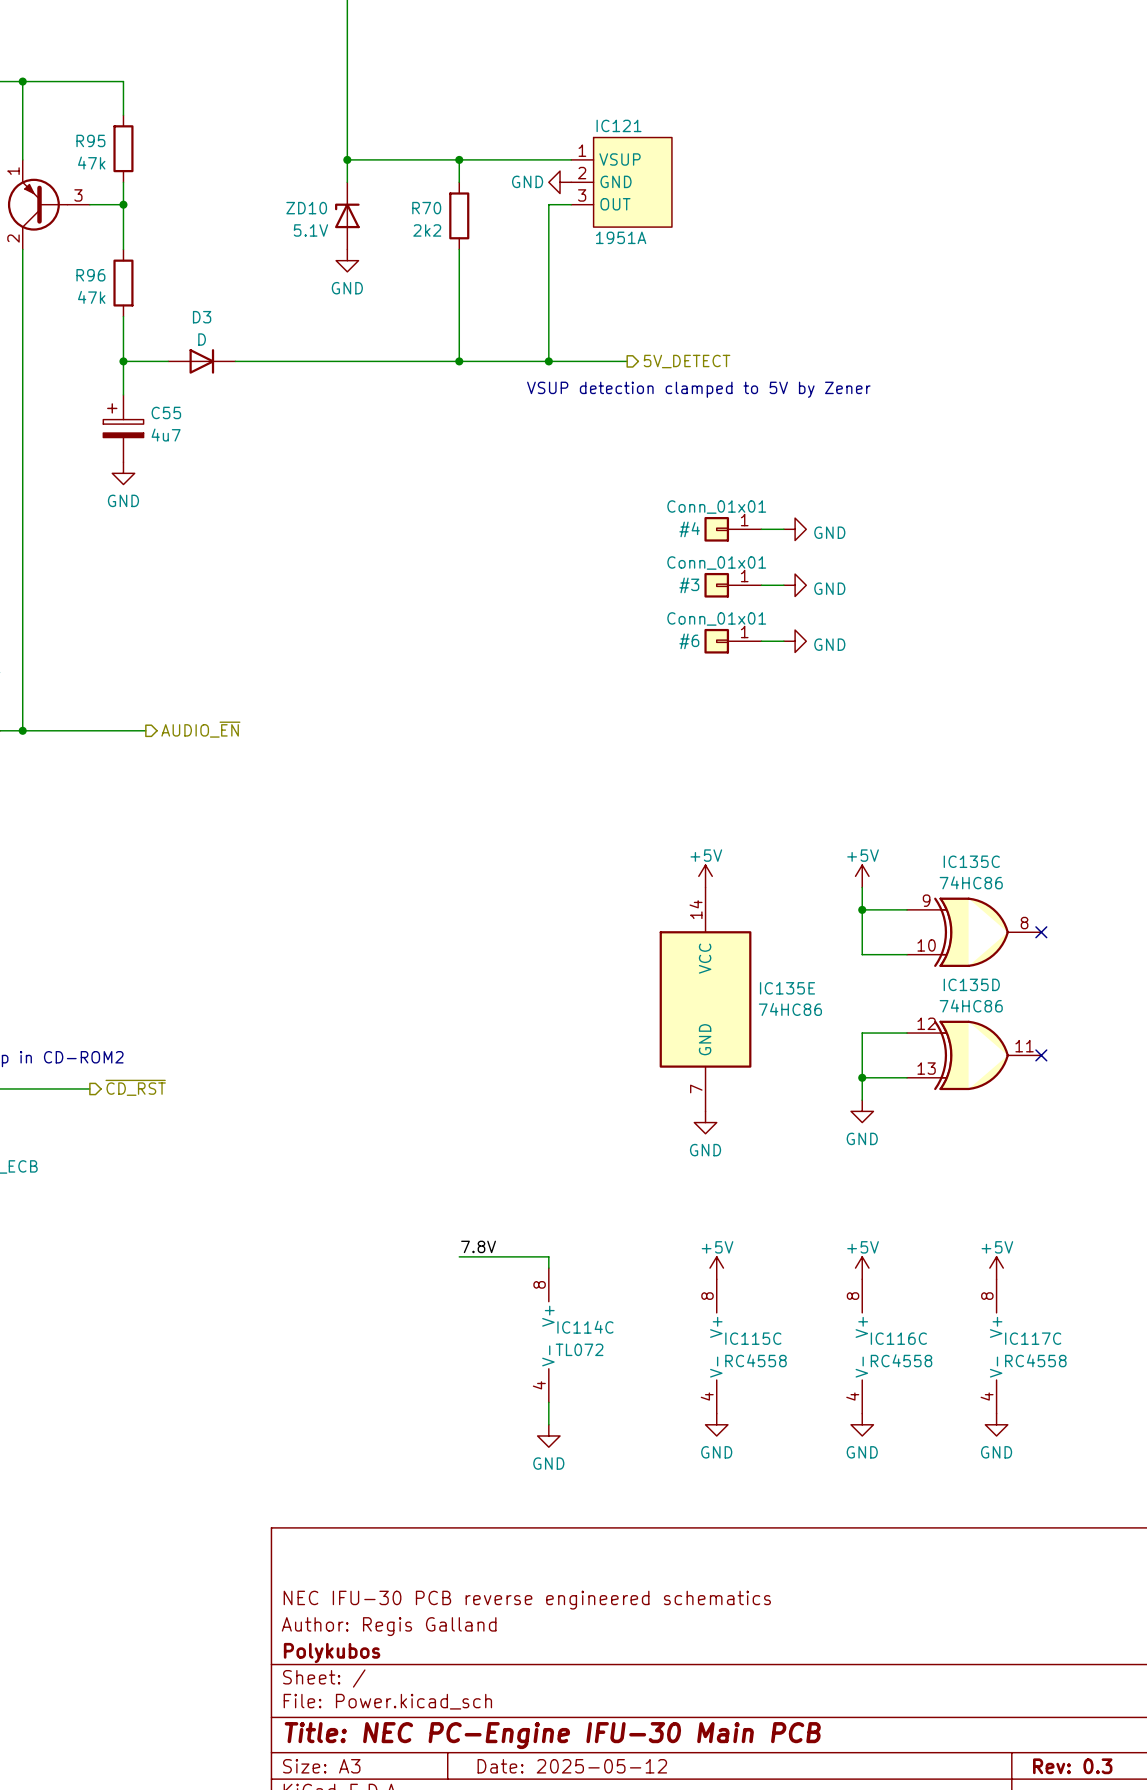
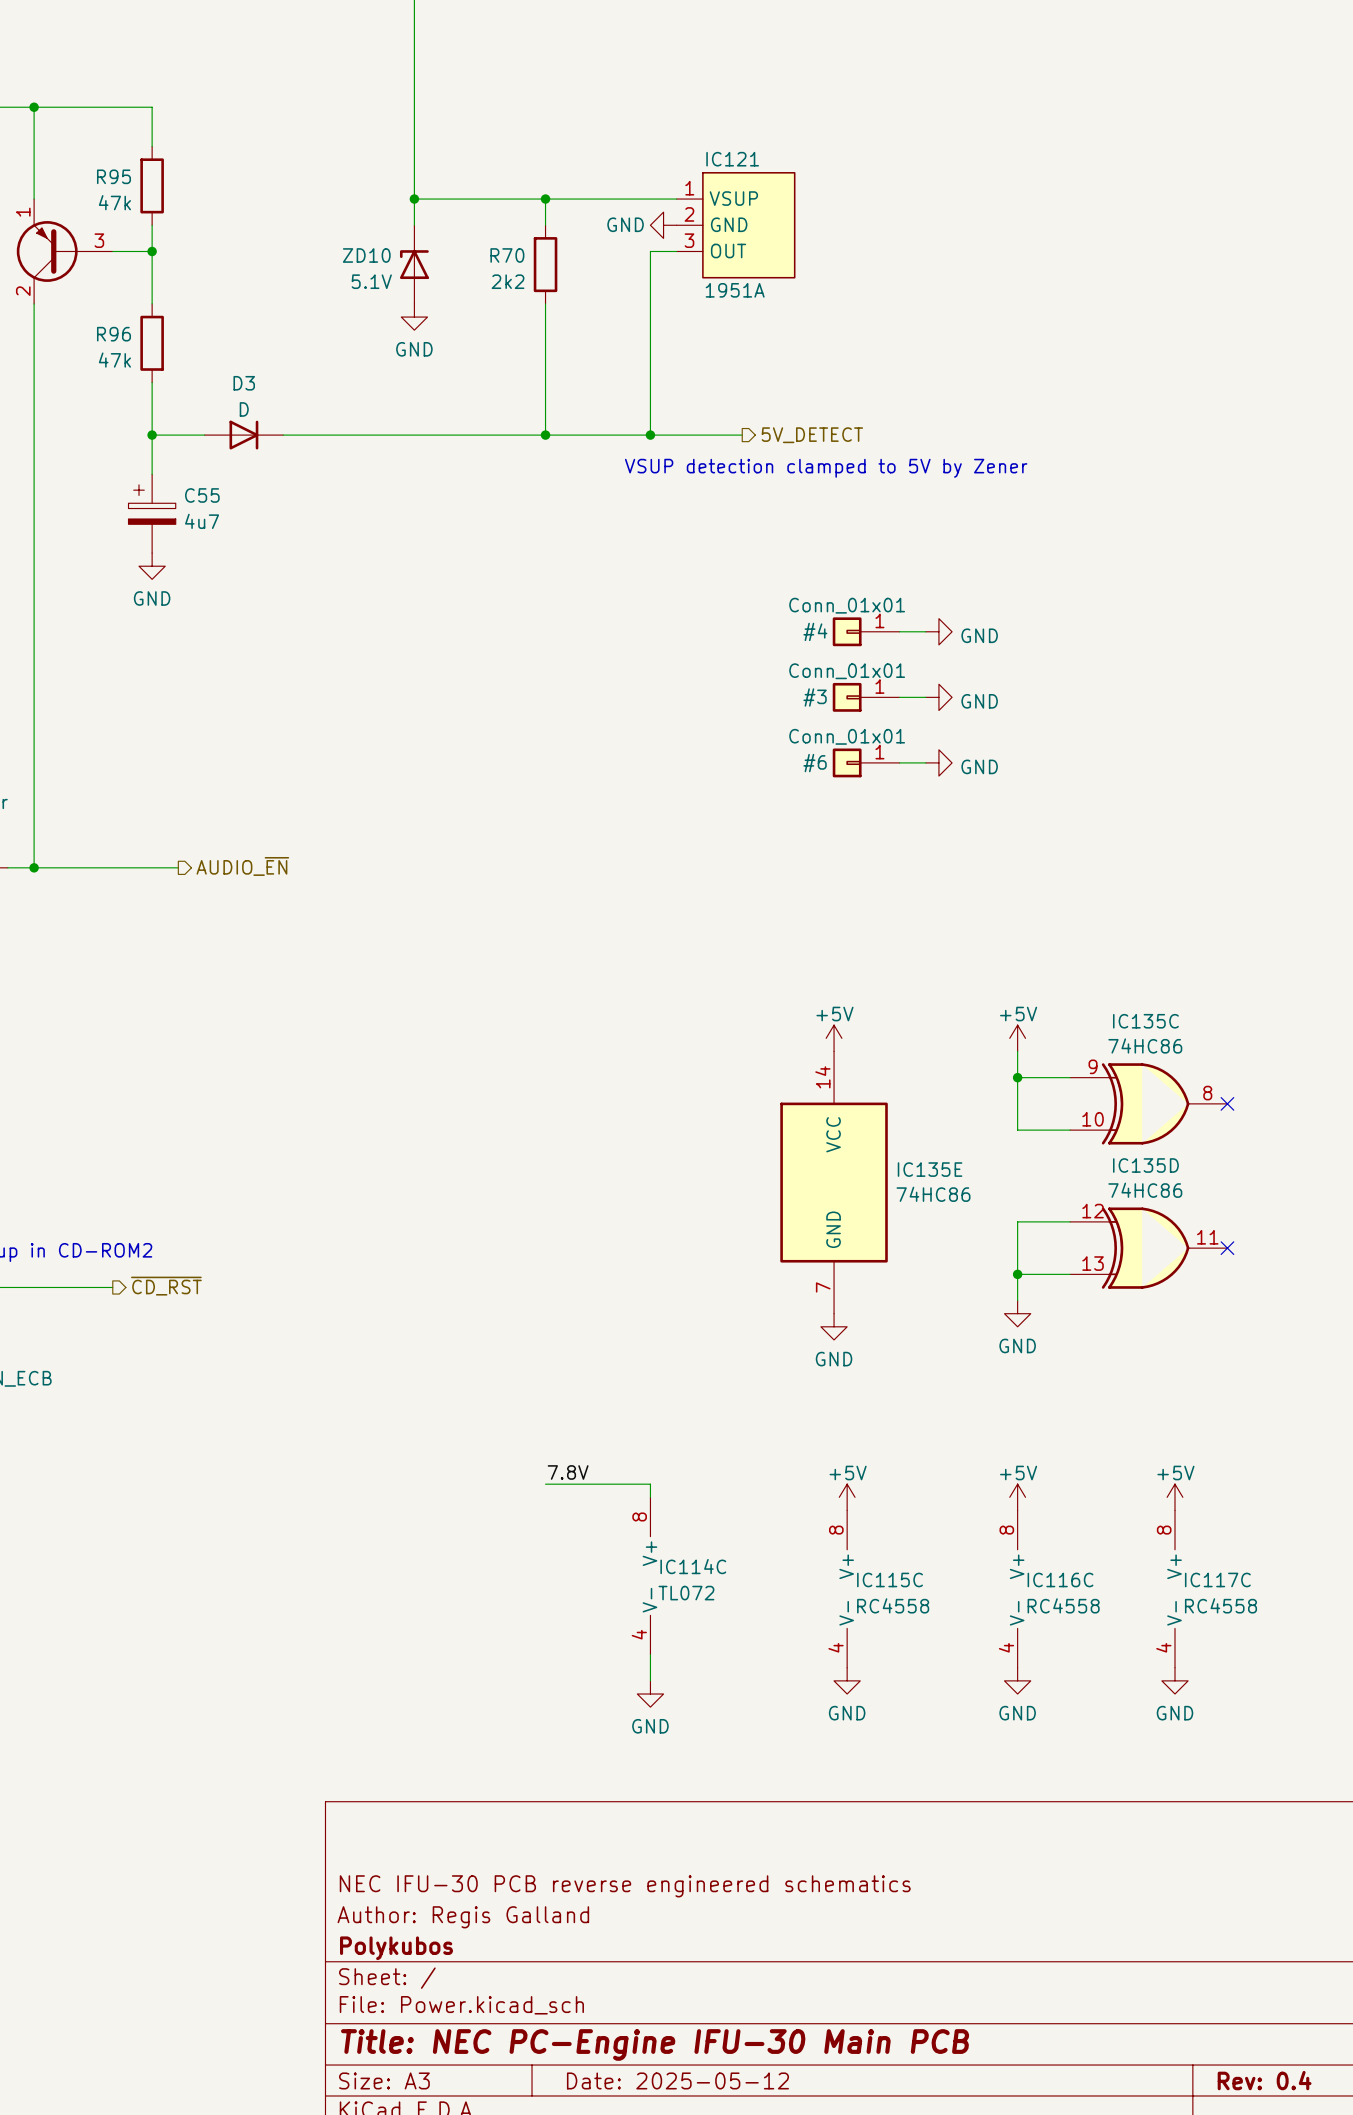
title block: Rev: 0.3 (1072, 1766) -> Rev: 0.4 (1264, 2080)

